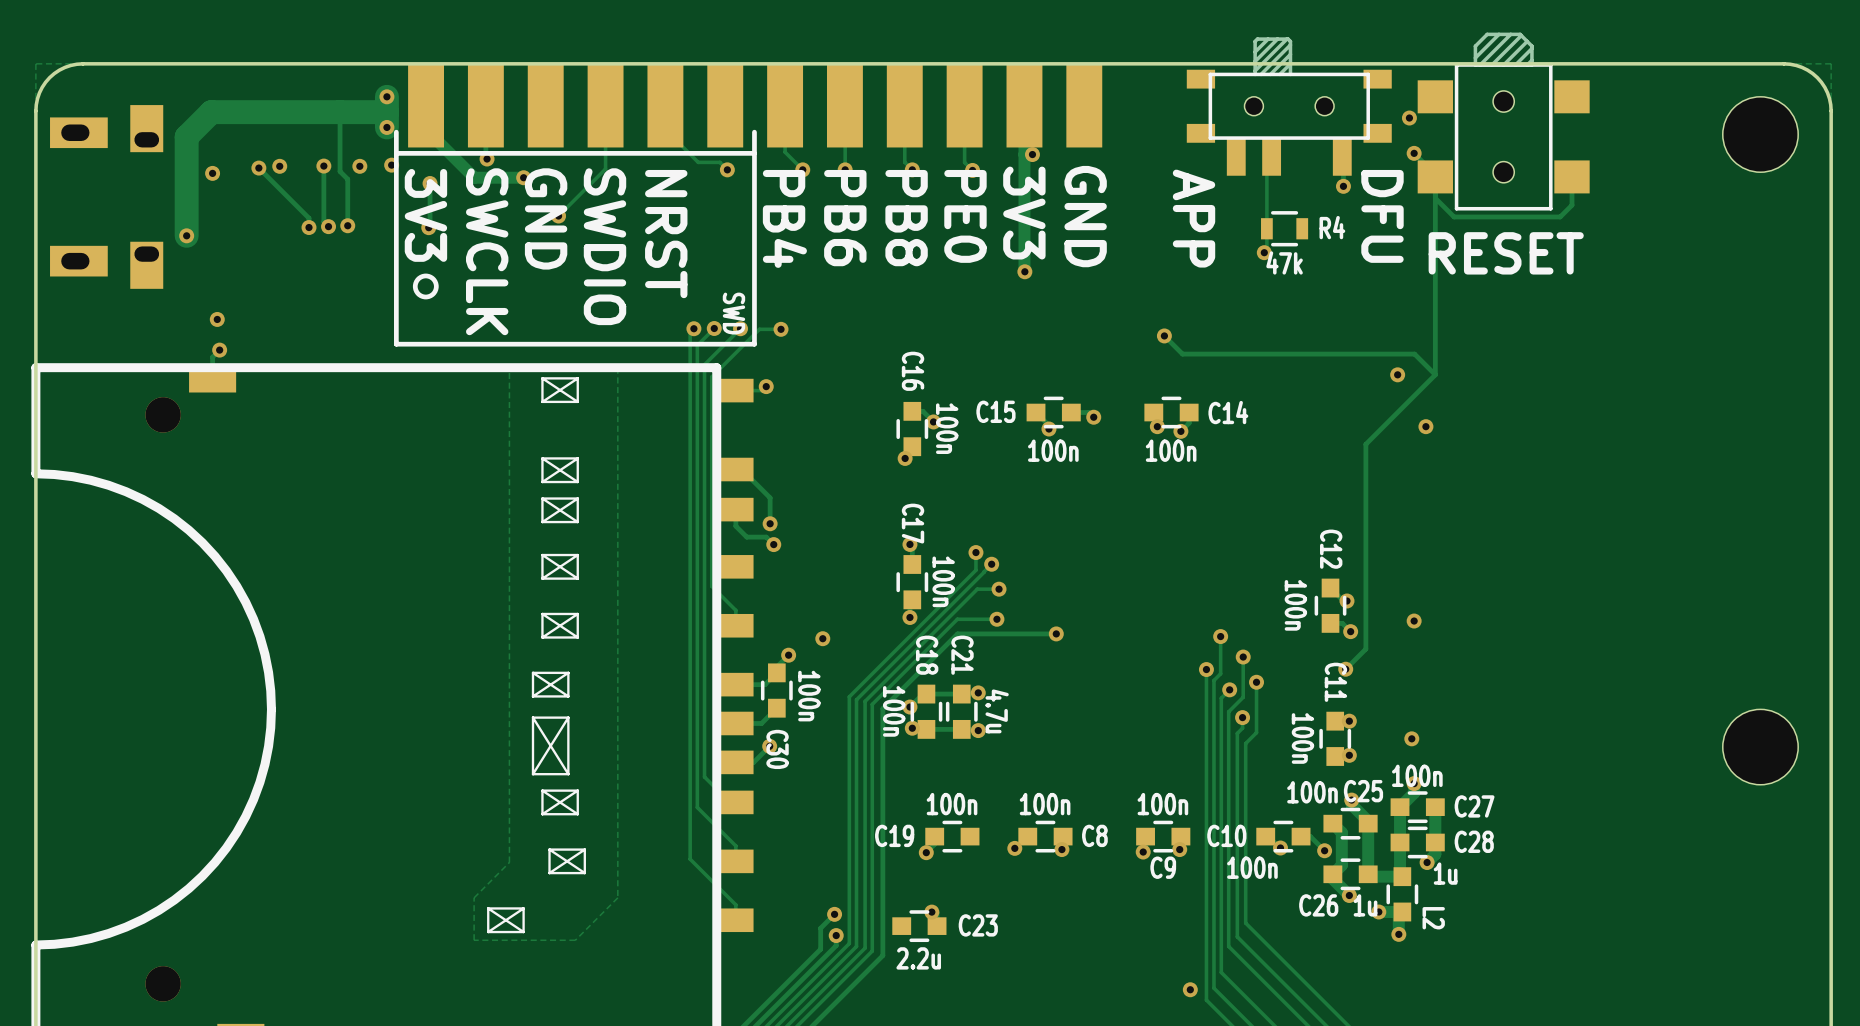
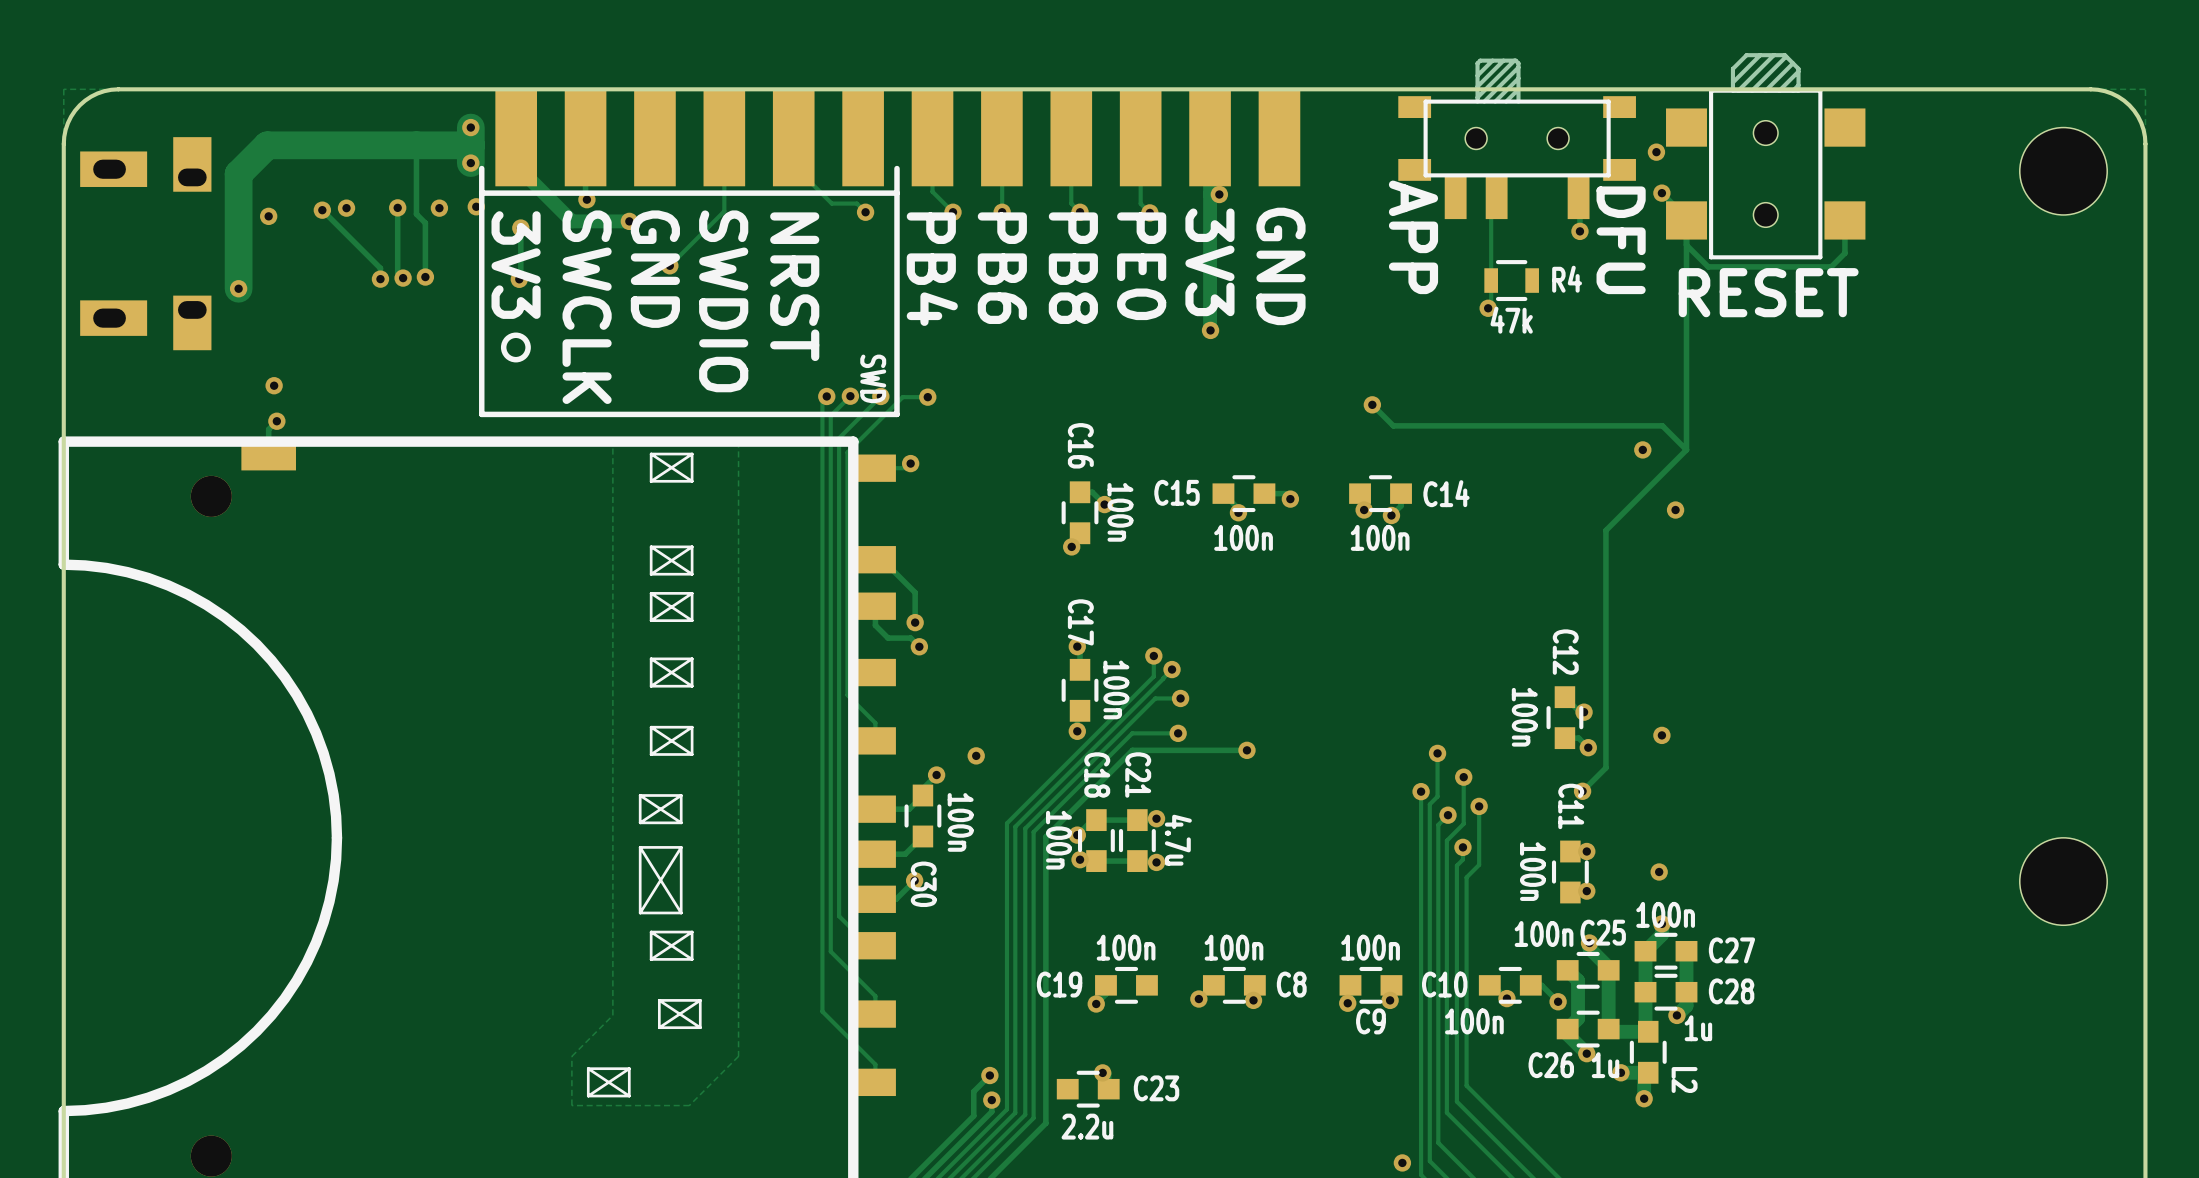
text position: DFU (1382, 216) -> DFU (1621, 240)
text position: APP (1194, 218) -> APP (1413, 237)
text position: RESET (1506, 253) -> RESET (1768, 292)

